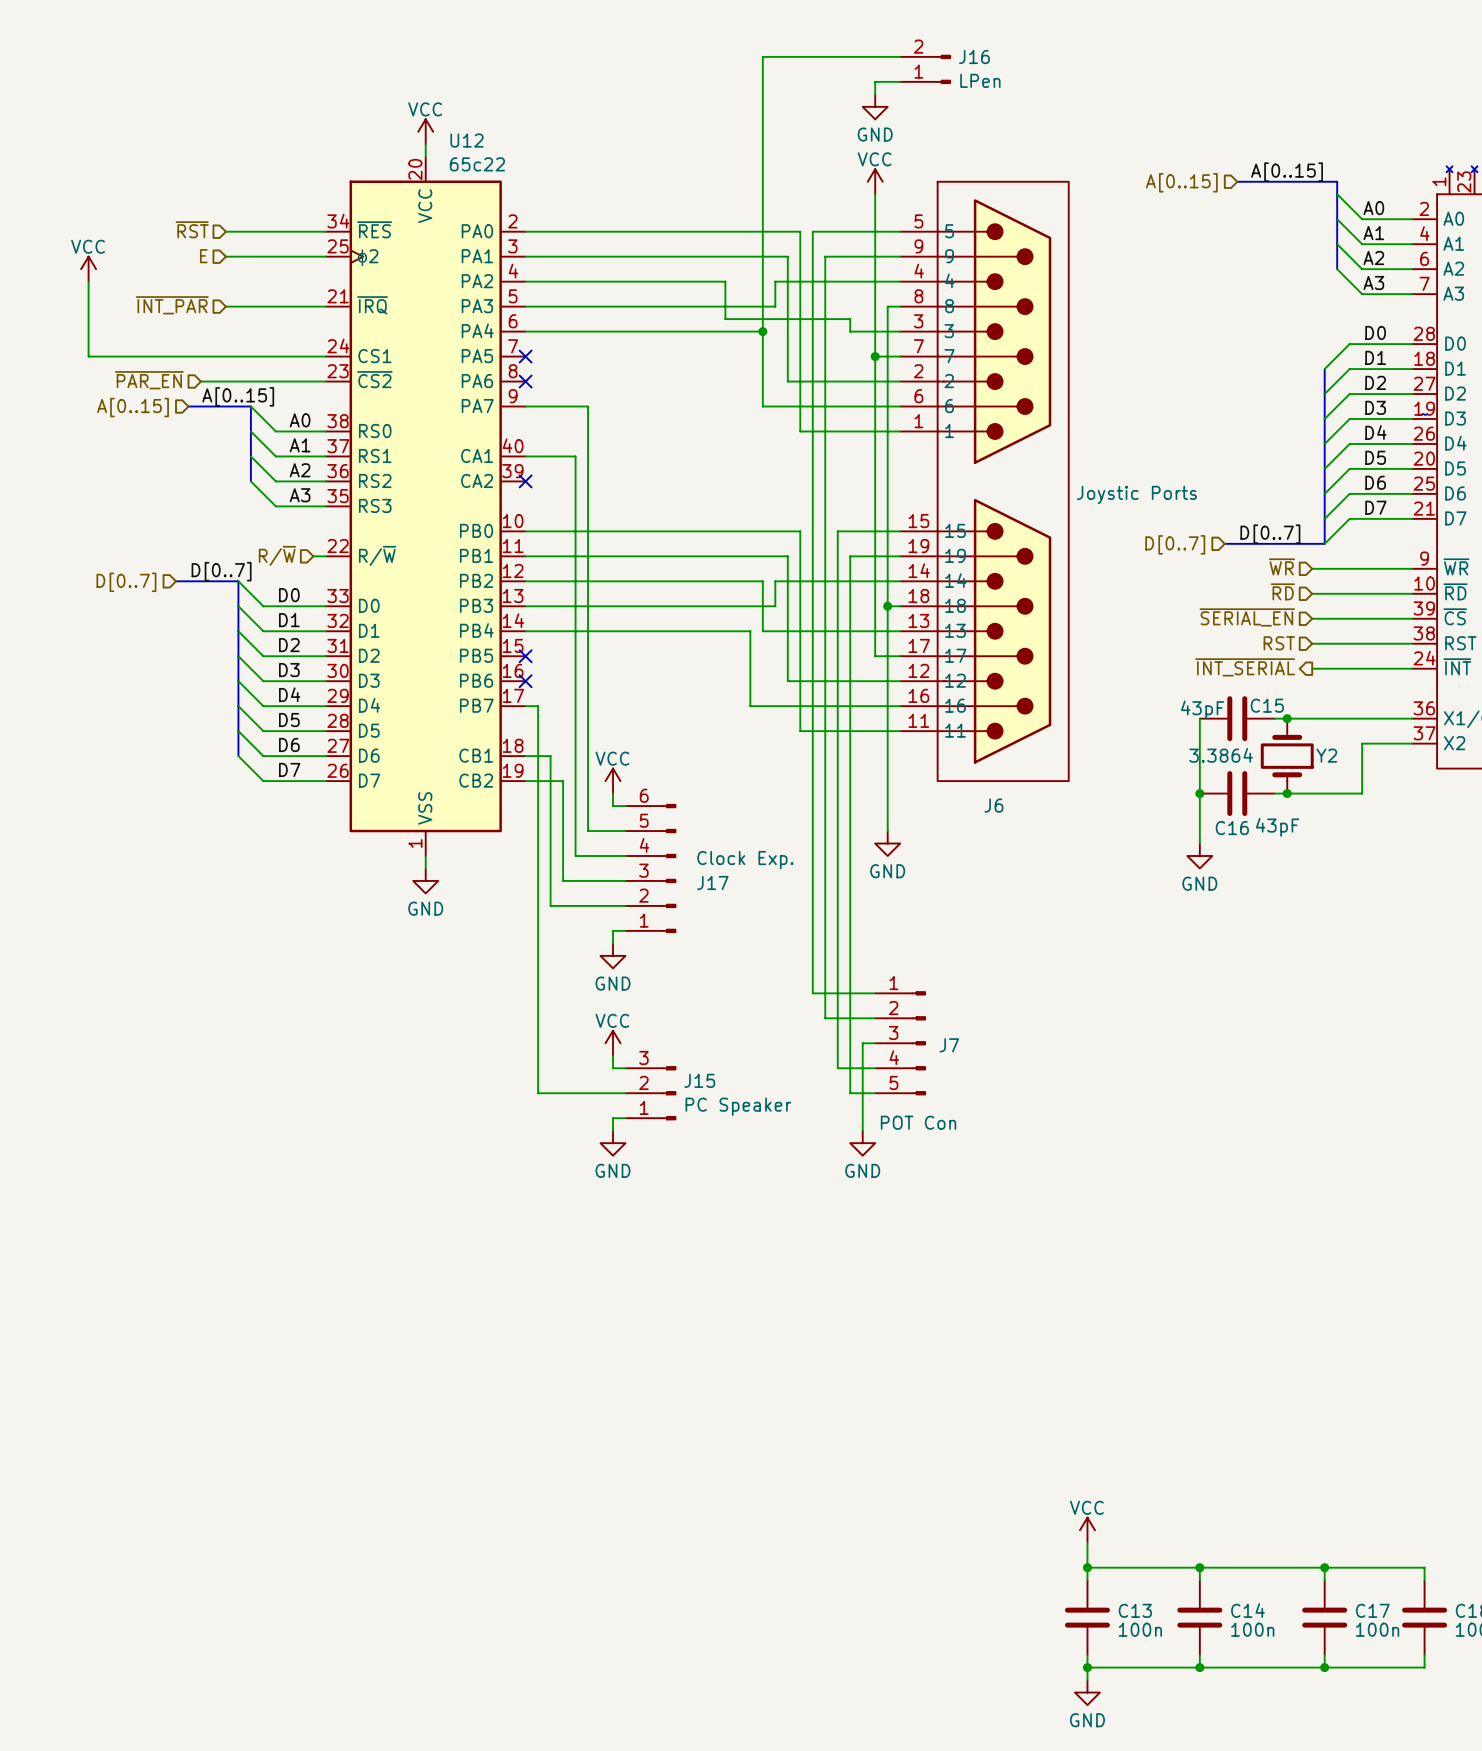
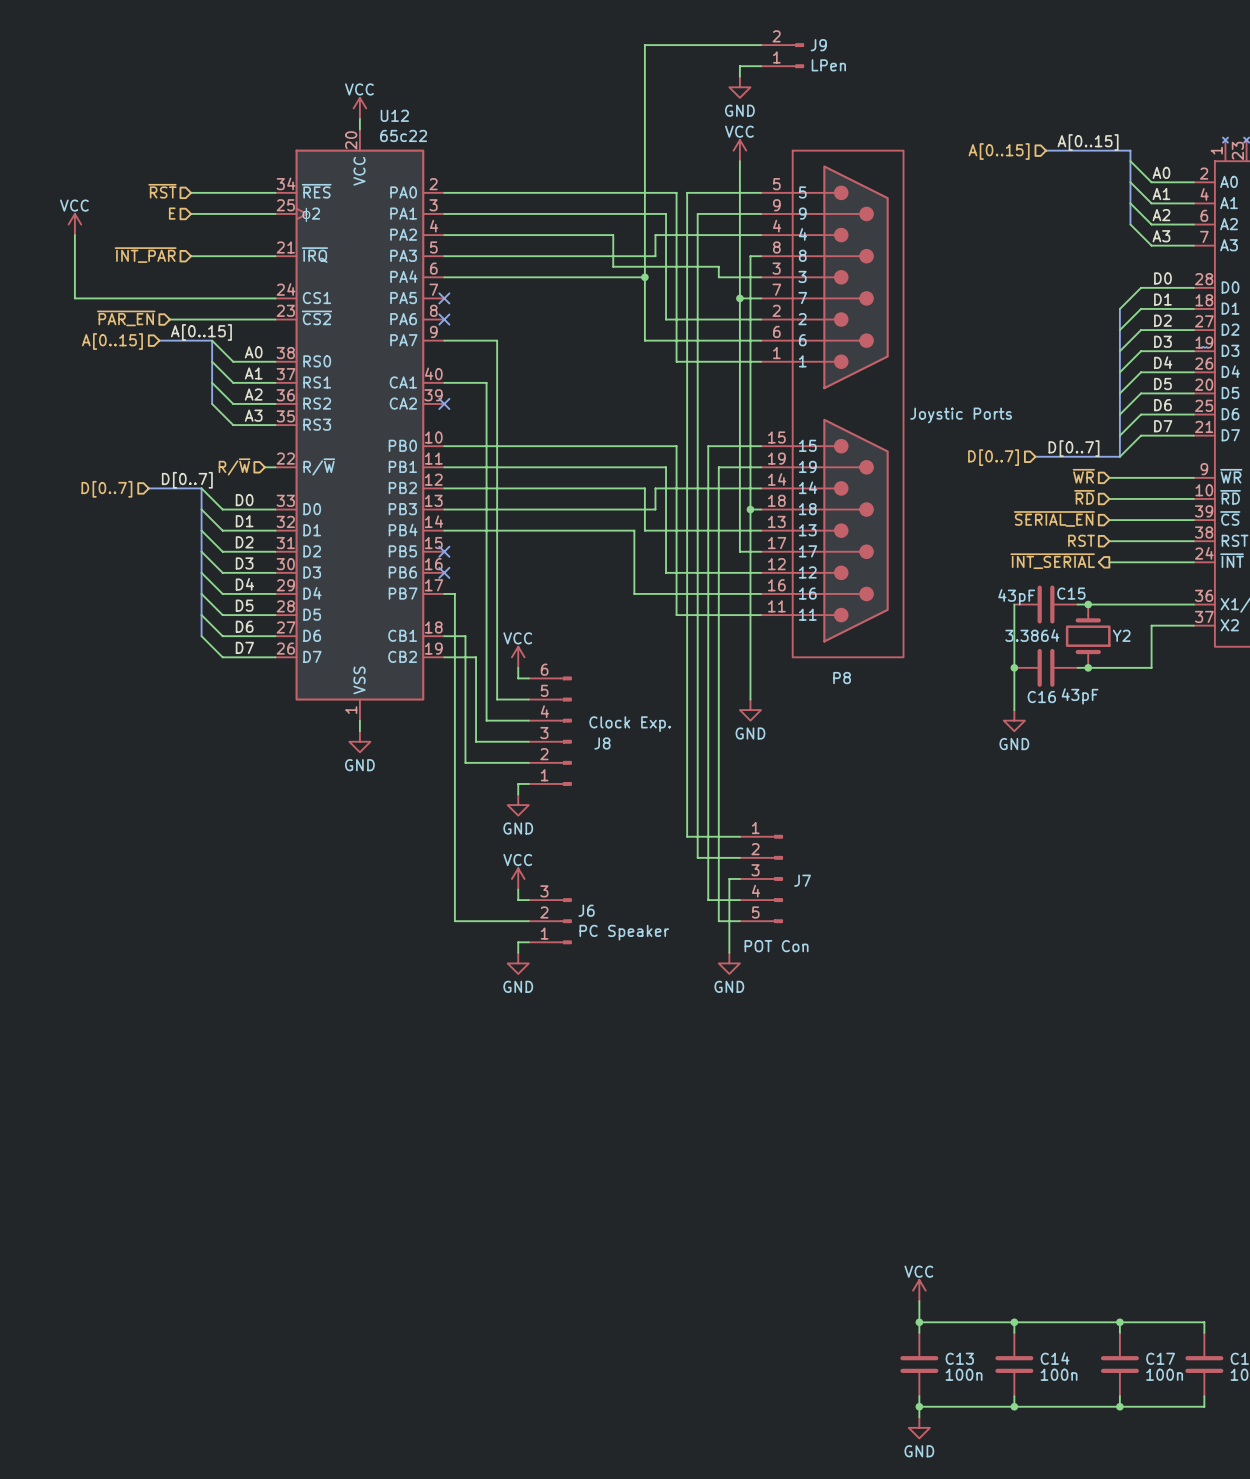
J16 name: J16 (974, 57) -> J9 (818, 45)
J6 name: J6 (993, 805) -> P8 (842, 678)
J17 name: J17 (712, 883) -> J8 (602, 743)
J15 name: J15 (699, 1080) -> J6 (586, 910)

